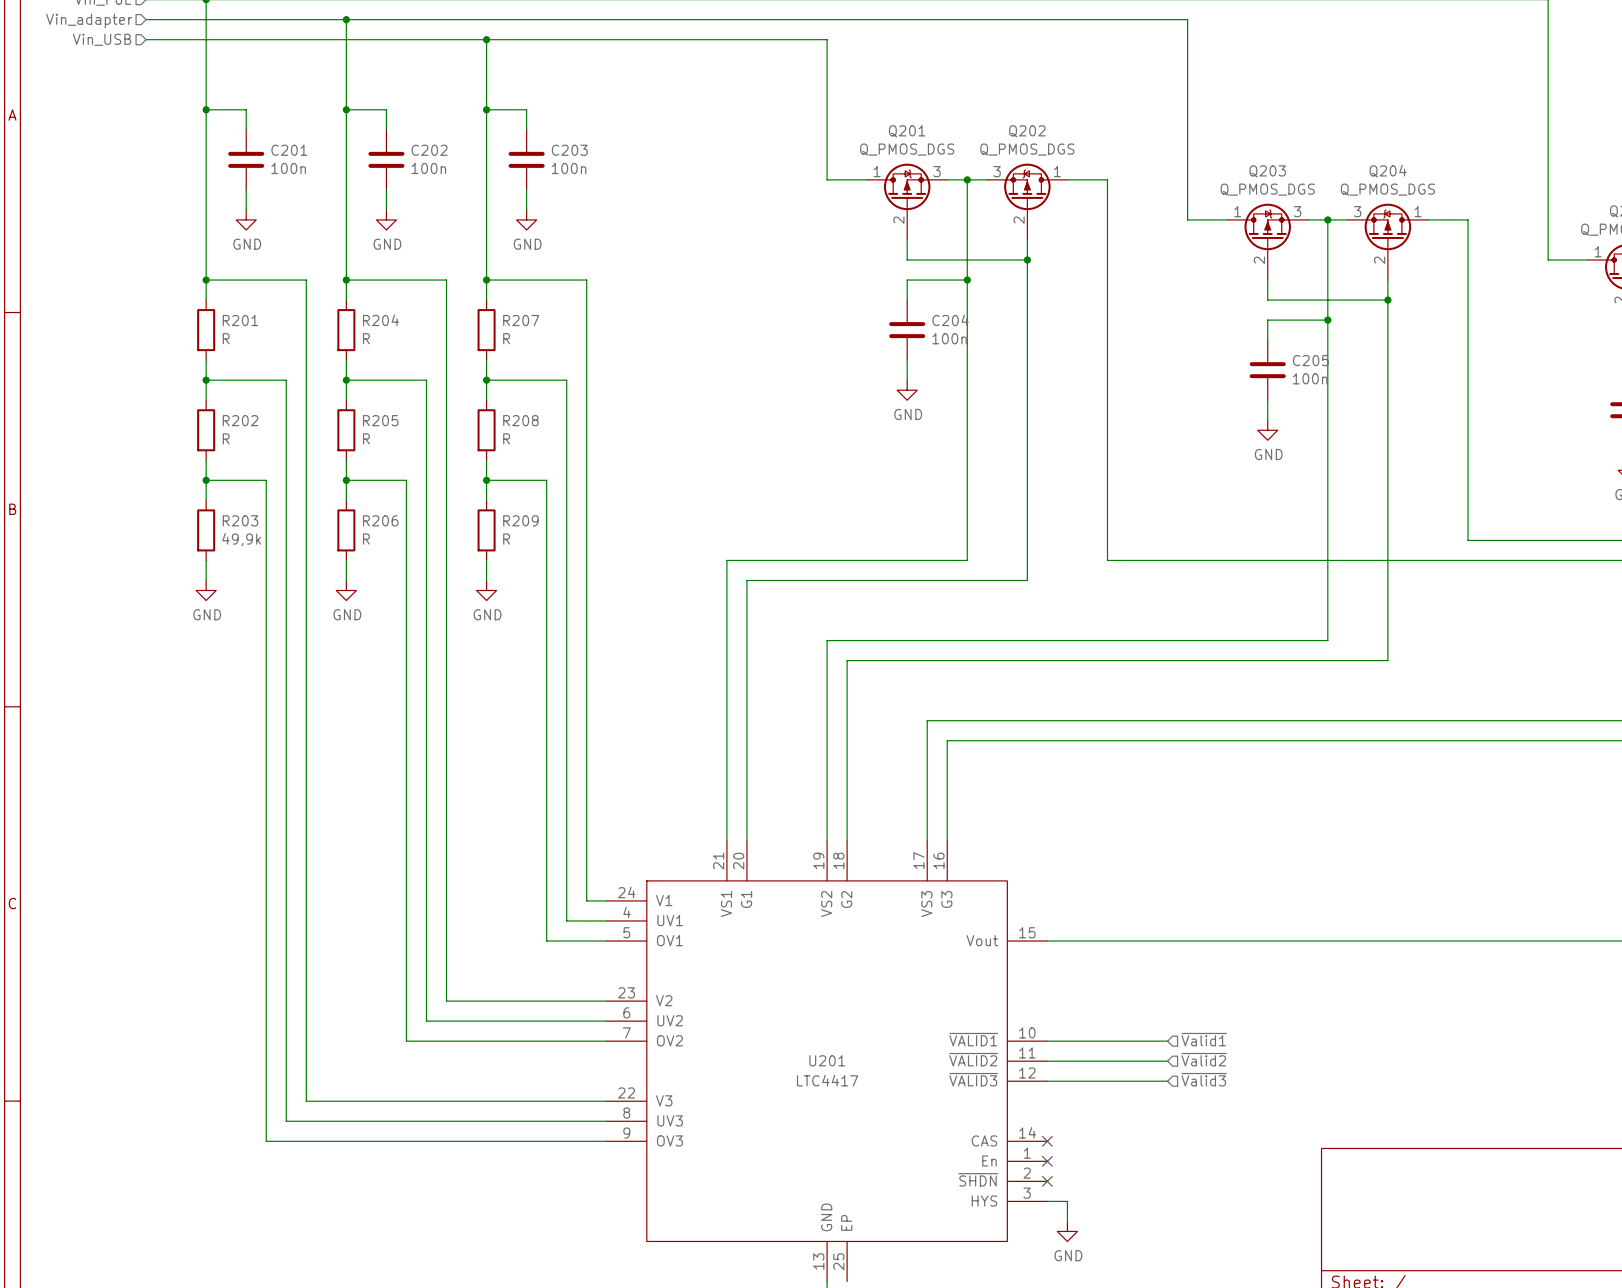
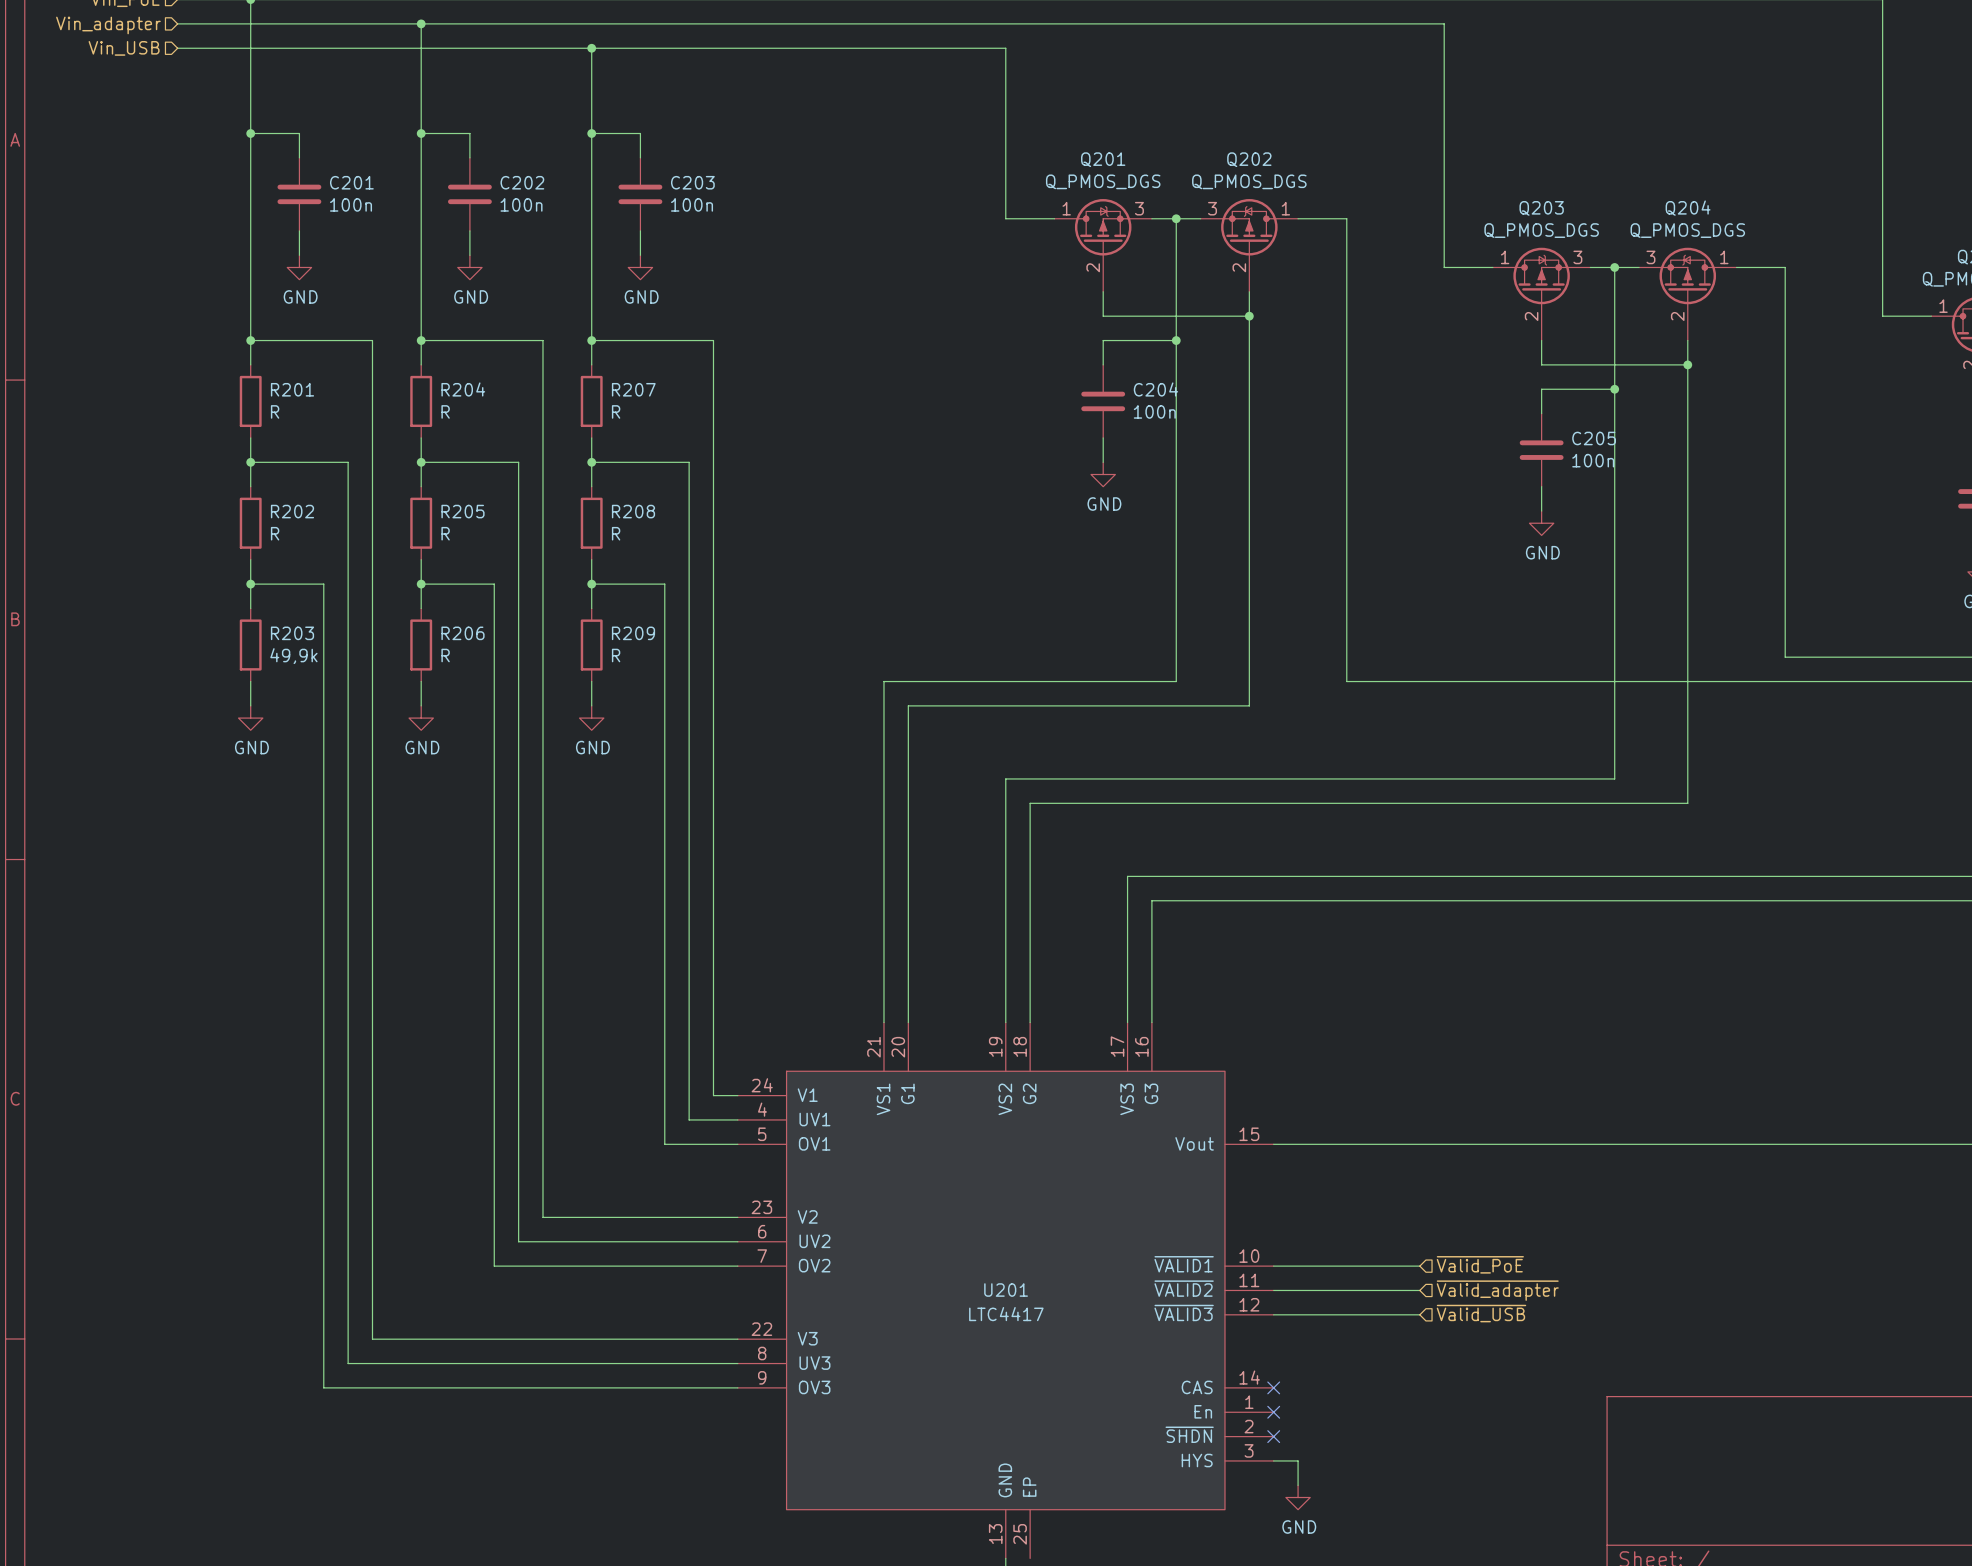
hierarchical label: ~{Valid1} (1204, 1039) -> ~{Valid_PoE} (1480, 1264)
hierarchical label: ~{Valid2} (1204, 1059) -> ~{Valid_adapter} (1497, 1290)
hierarchical label: ~{Valid3} (1204, 1079) -> ~{Valid_USB} (1481, 1313)

